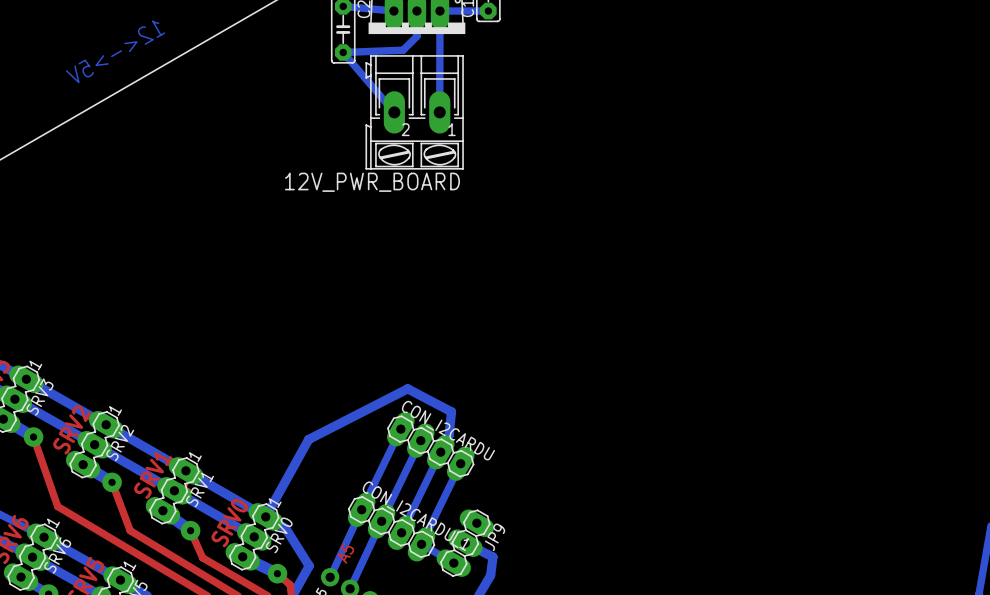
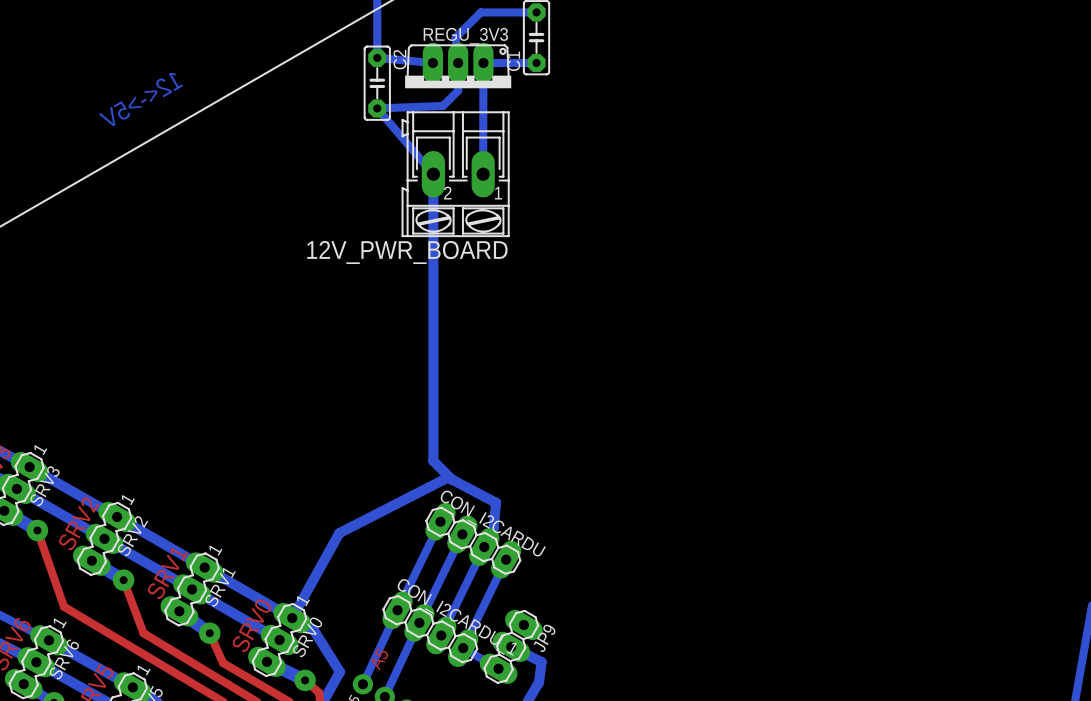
bottom track: none -> (433, 174) (433, 460) (452, 479)

